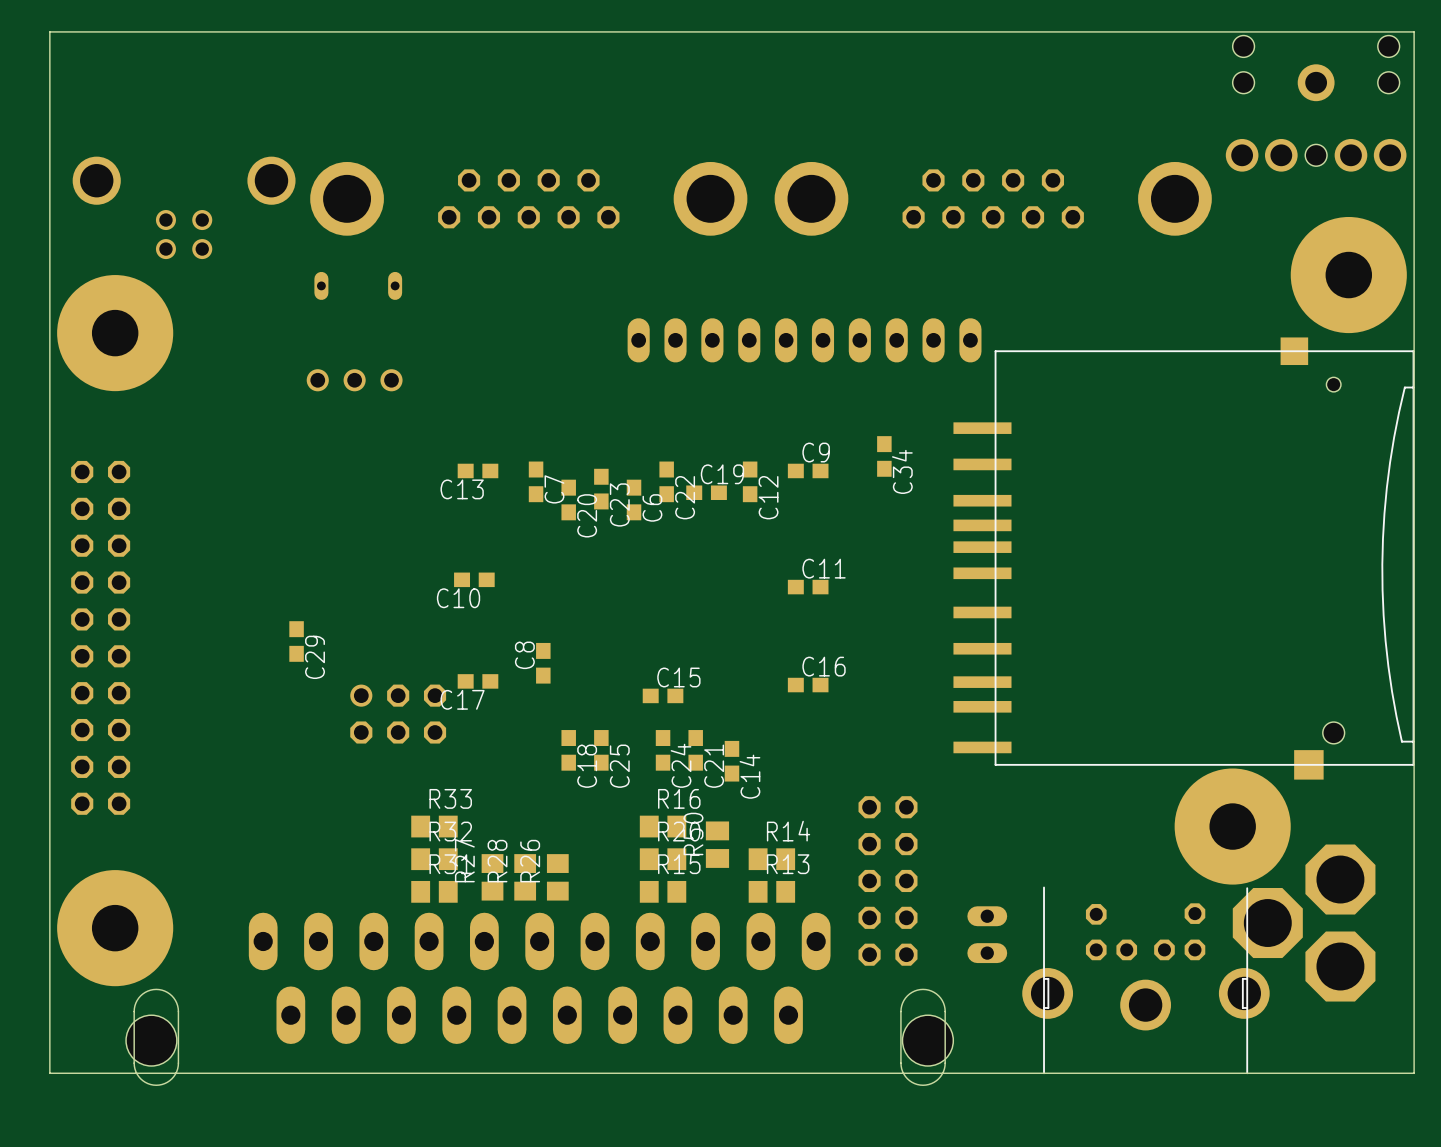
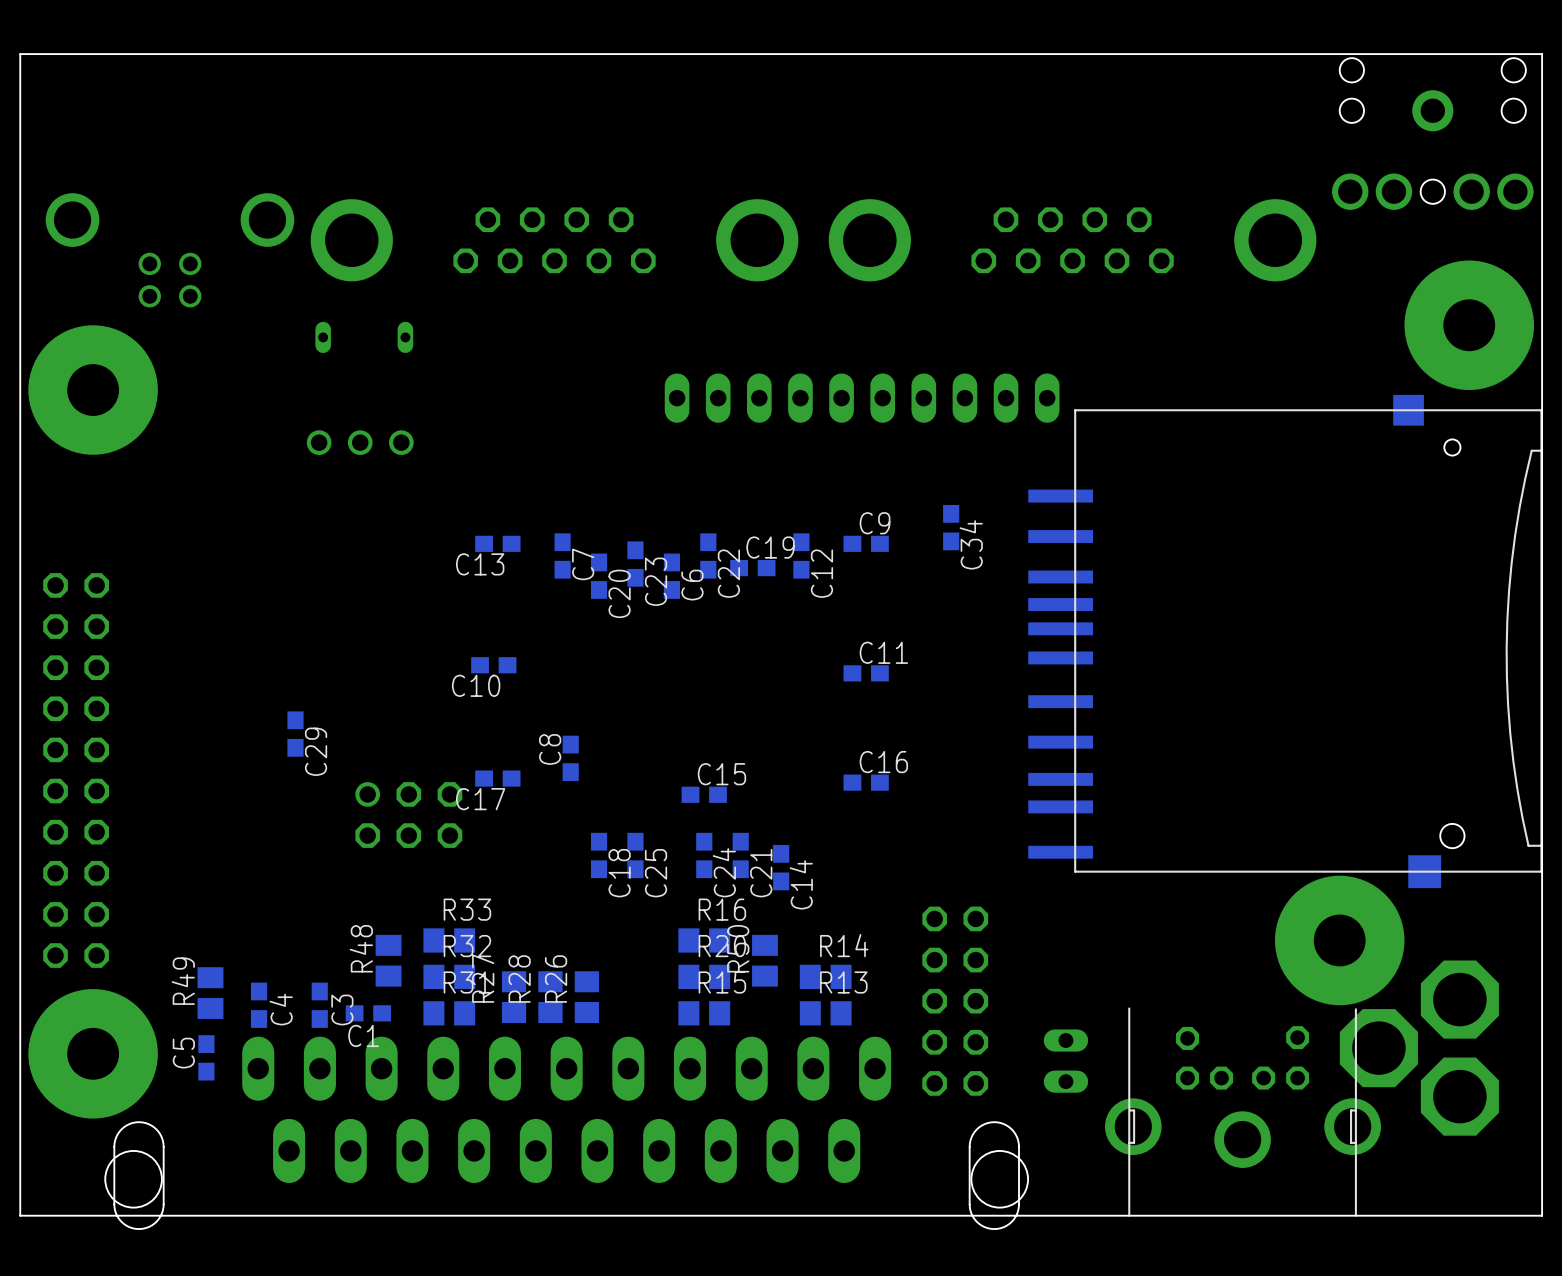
part position: (100, 637) -> (76, 770)
R48: none -> (388, 960)
R49: none -> (210, 993)
C4: none -> (259, 1005)
C3: none -> (319, 1005)
C1: none -> (368, 1013)
C5: none -> (206, 1057)

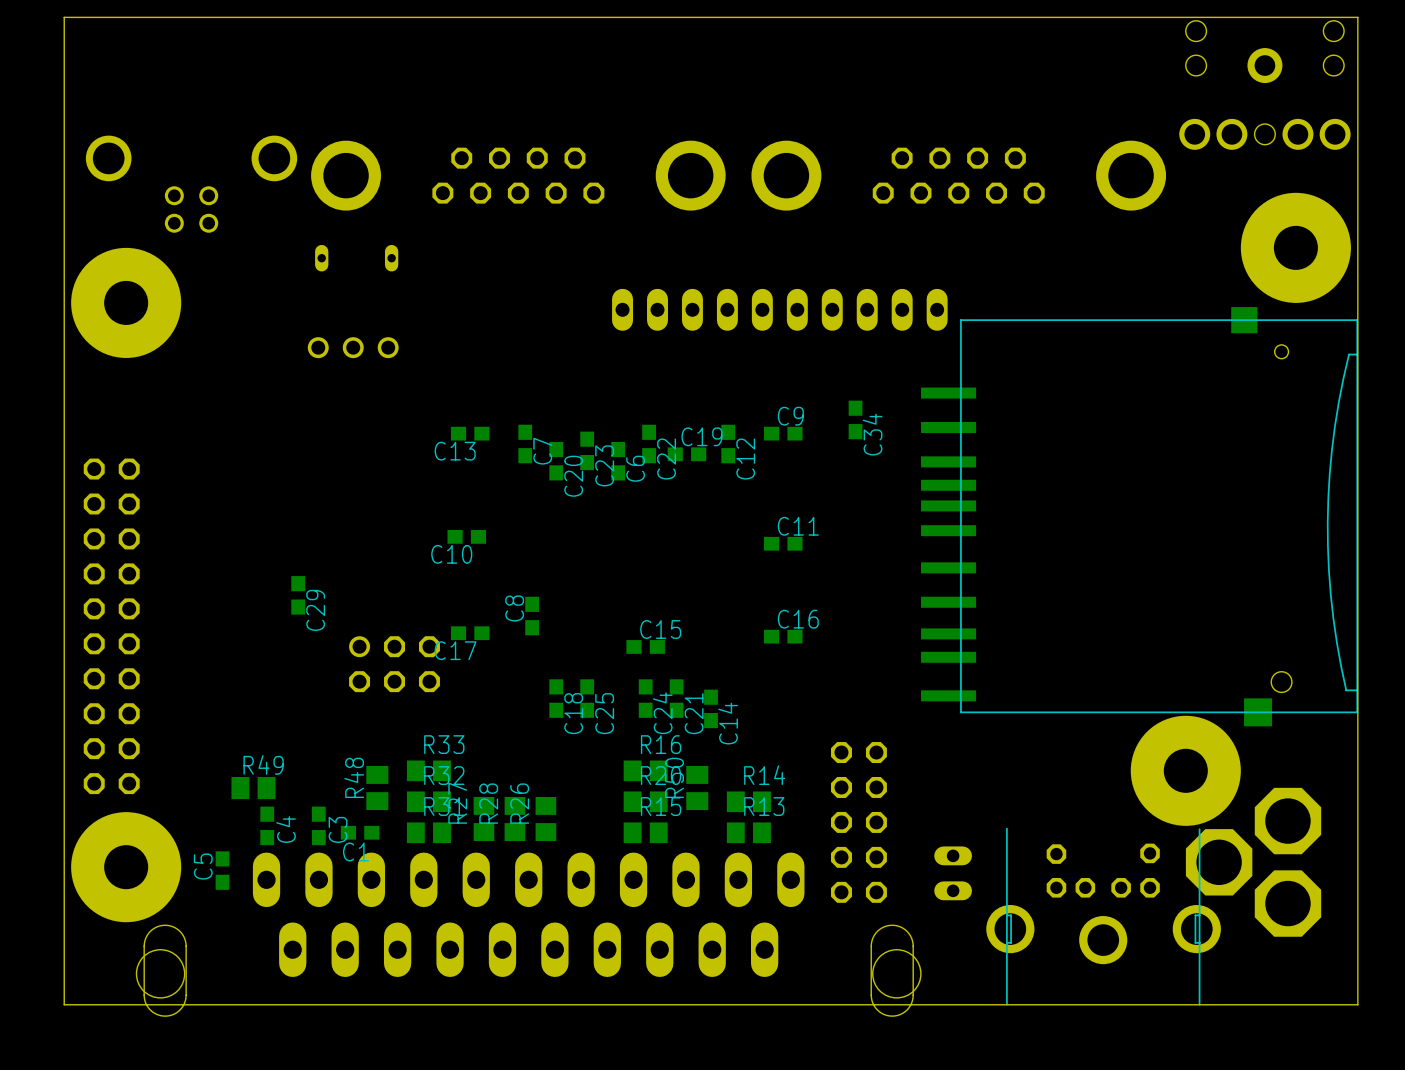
R49 rotation: 0° (210, 993) -> 90° clockwise (253, 788)
R49 position: (210, 993) -> (253, 788)

